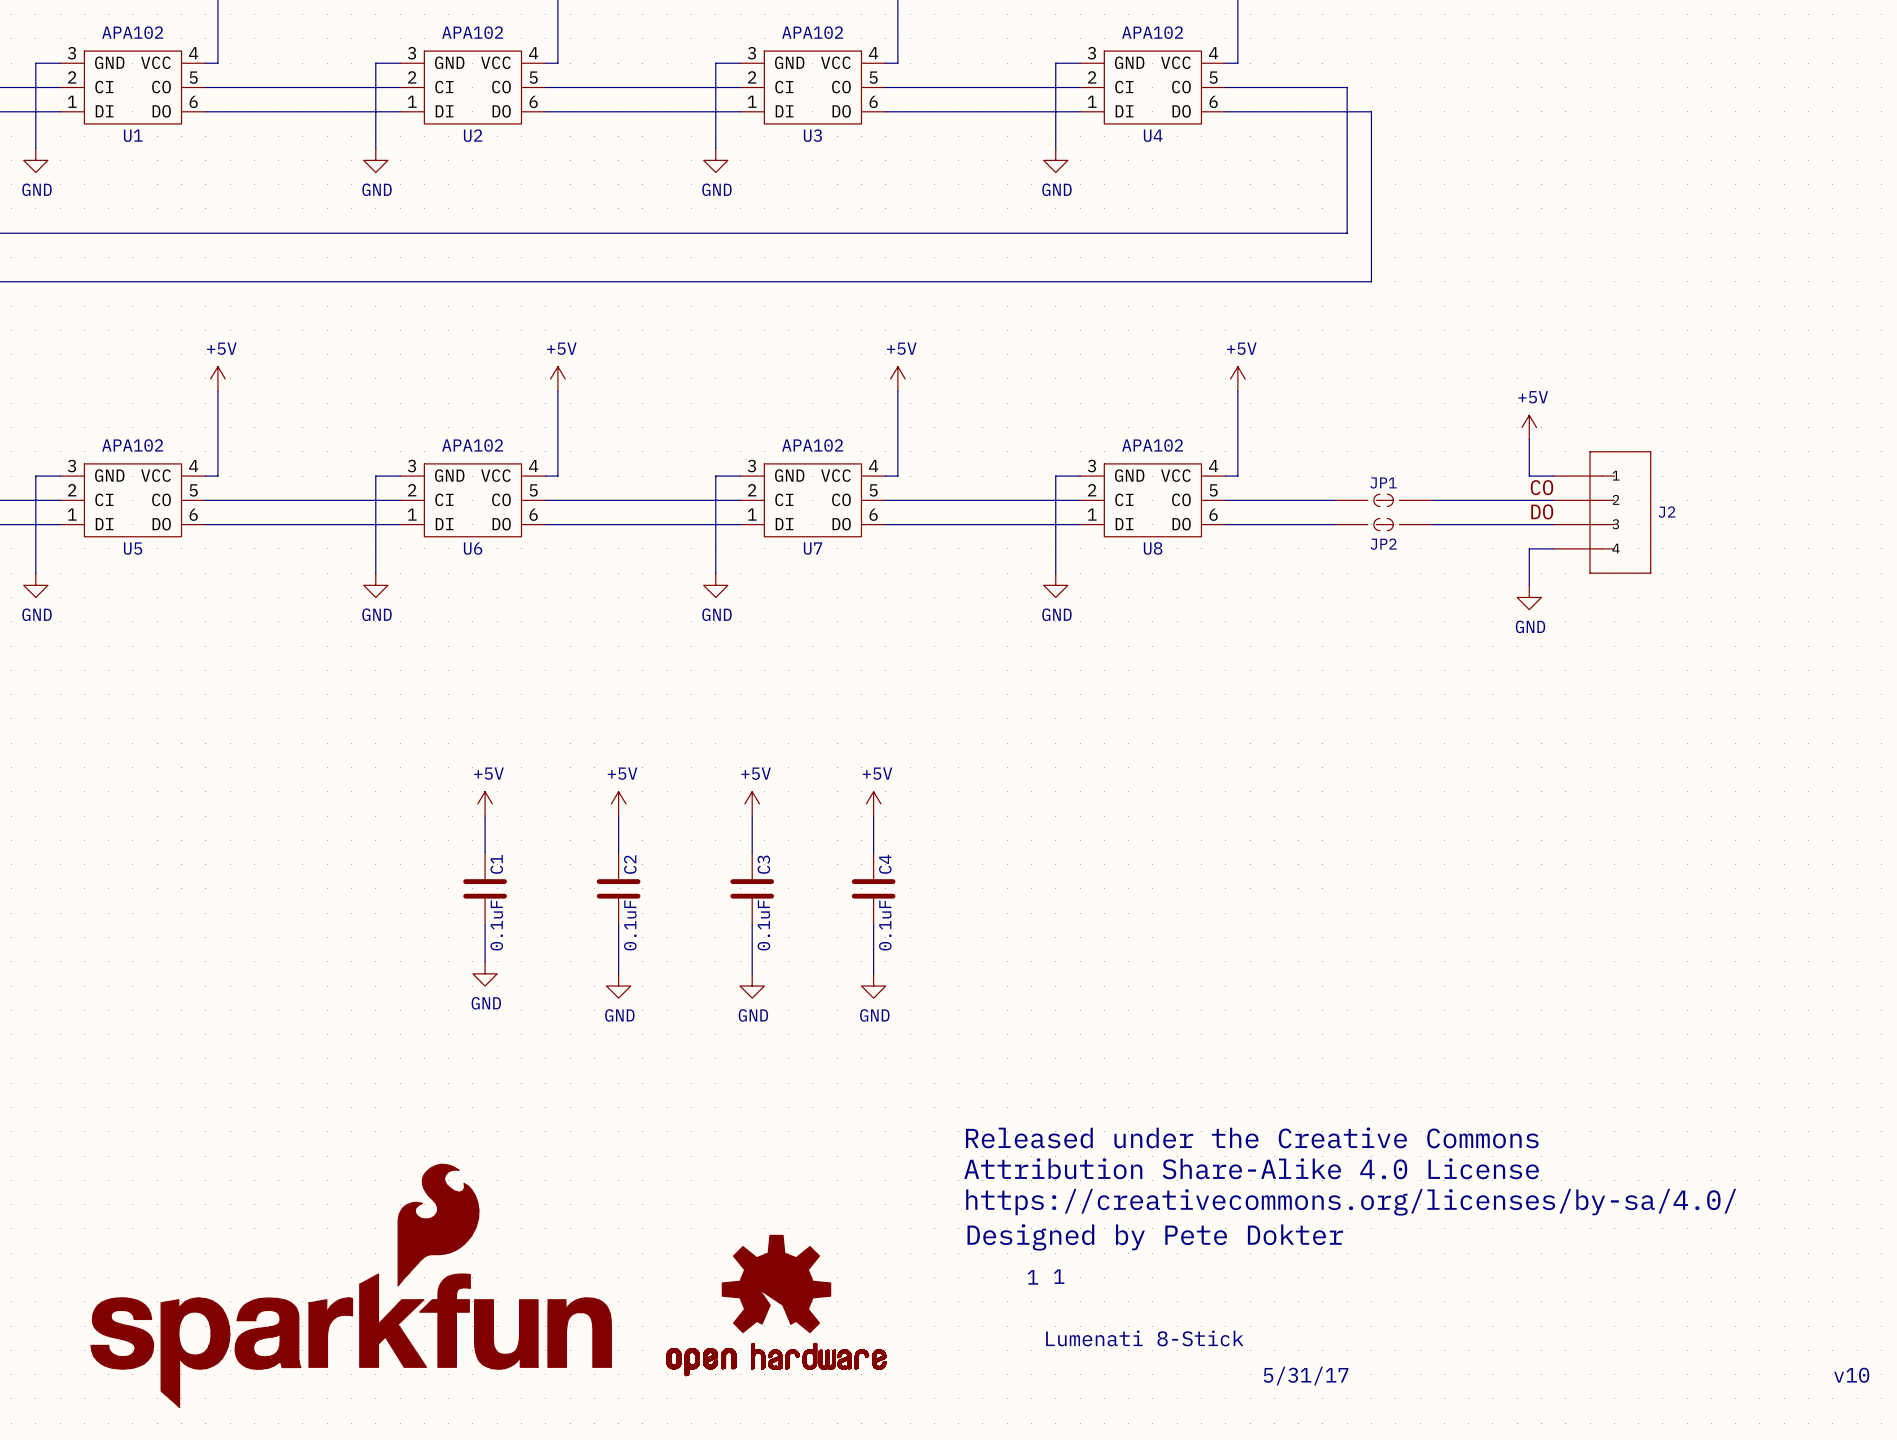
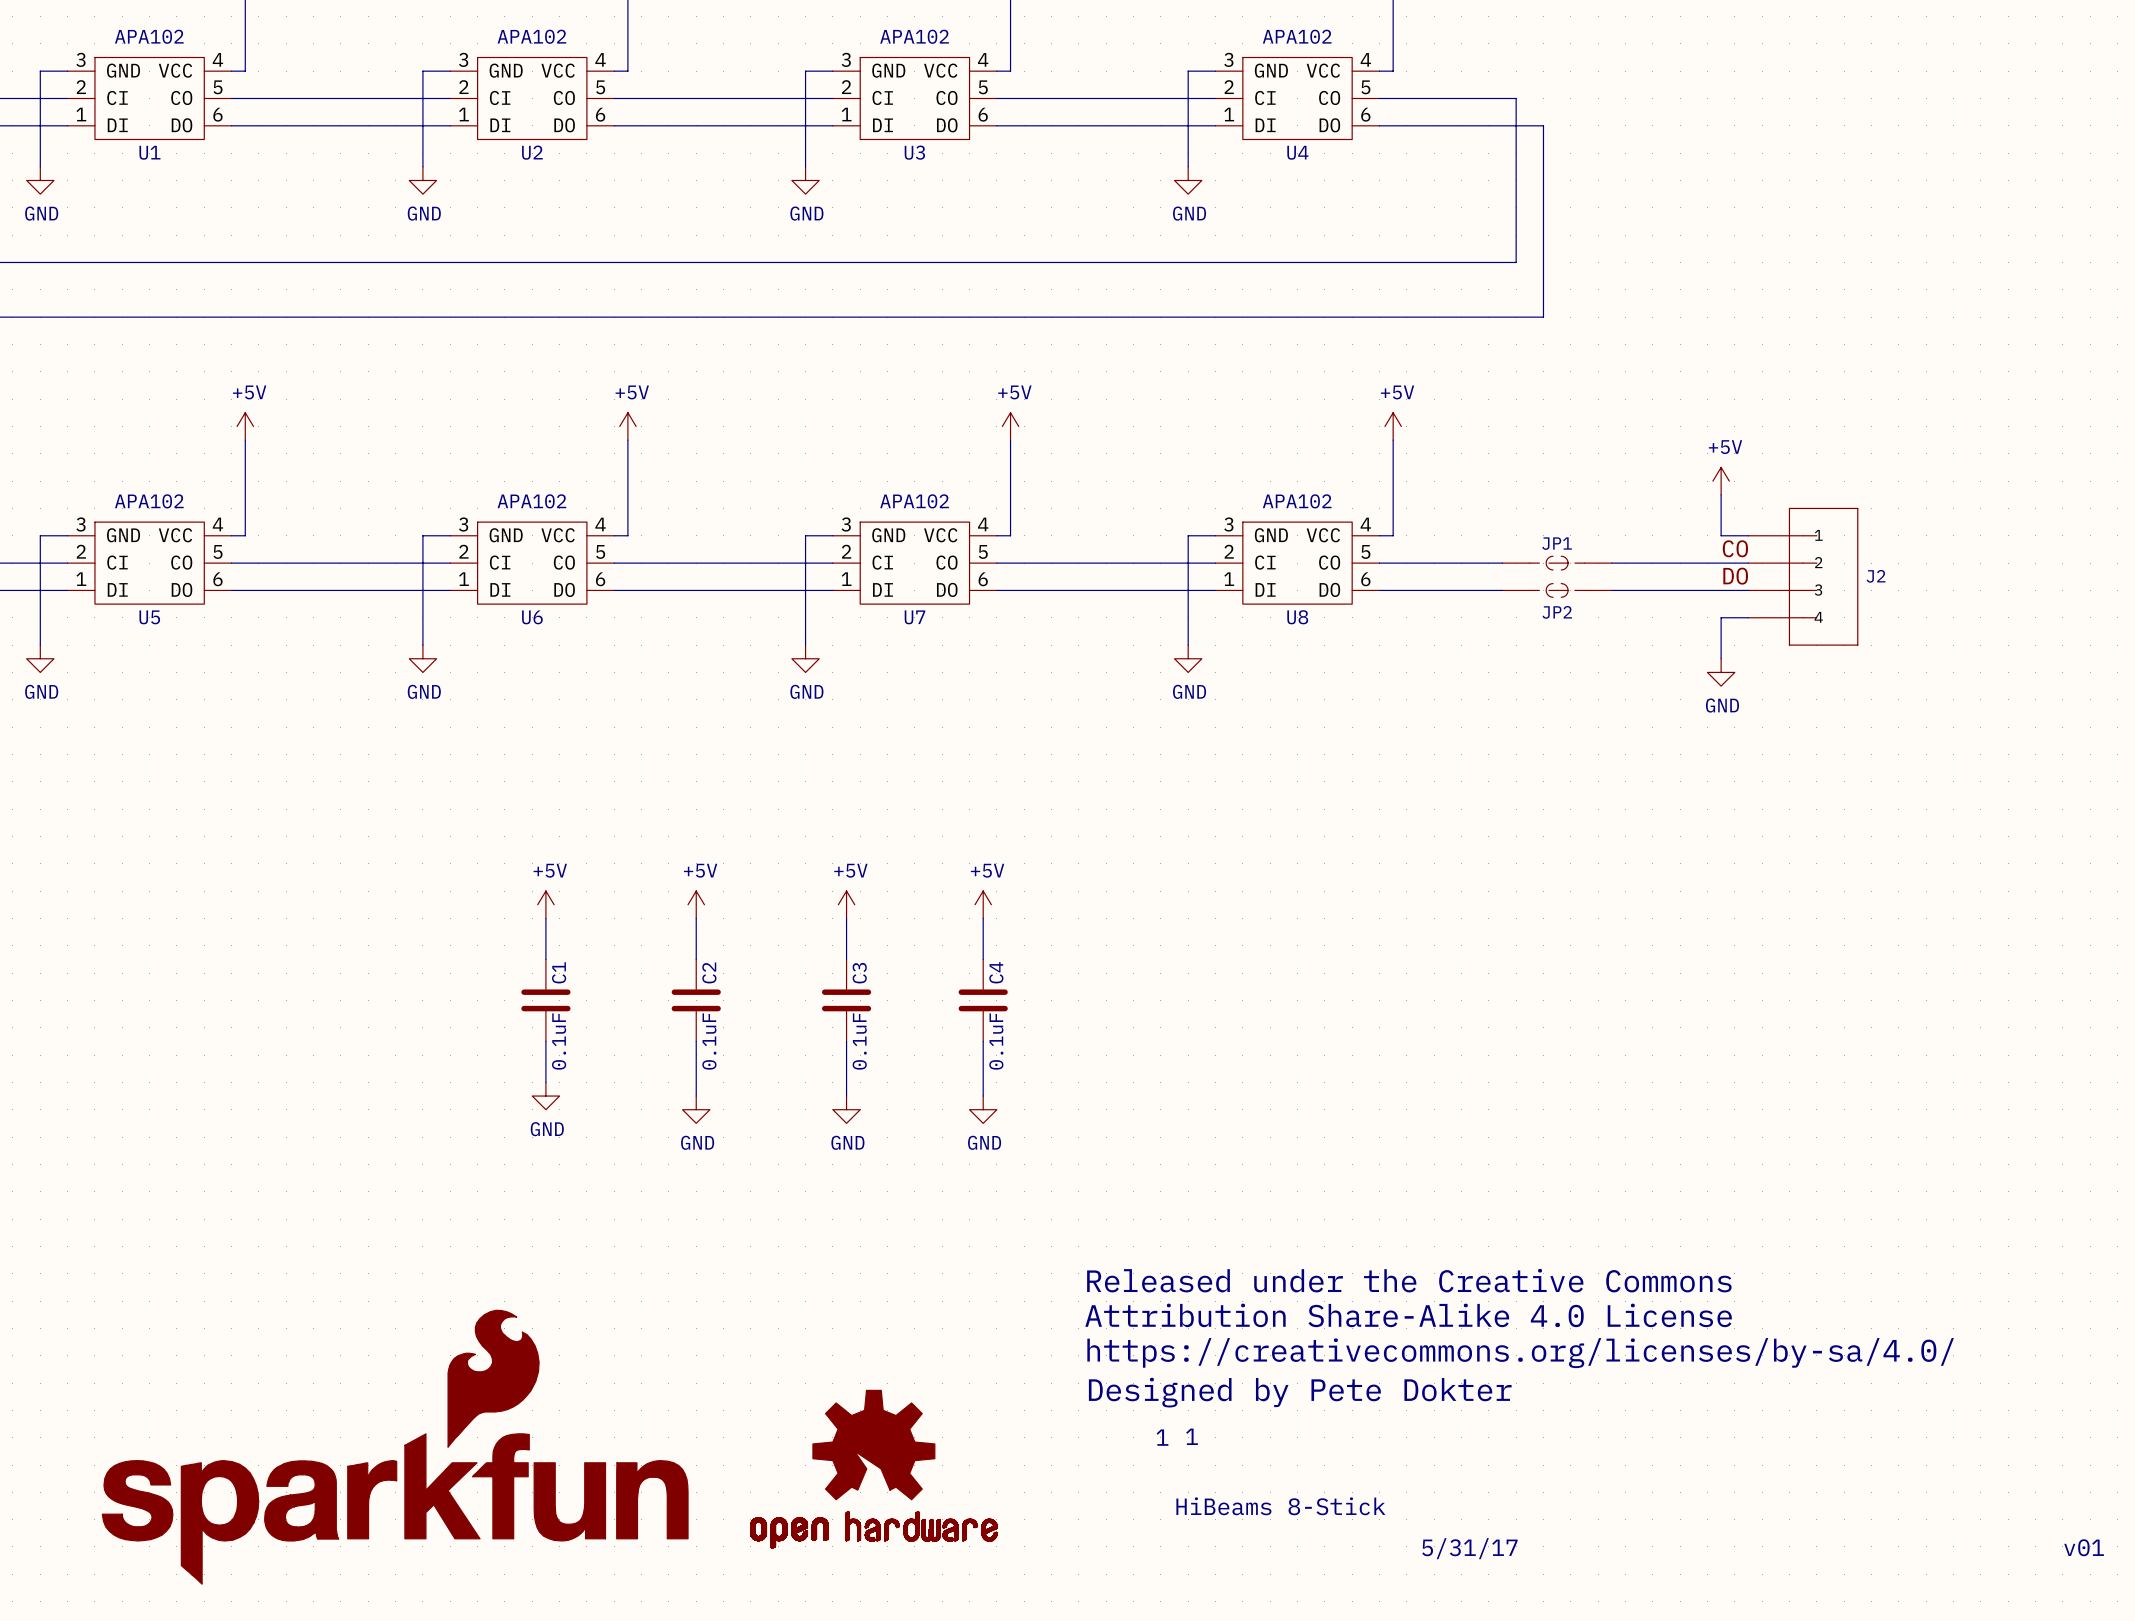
text: Lumenati 8-Stick (1144, 1338) -> HiBeams 8-Stick (1280, 1506)
text: v10 (1851, 1375) -> v01 (2084, 1547)

